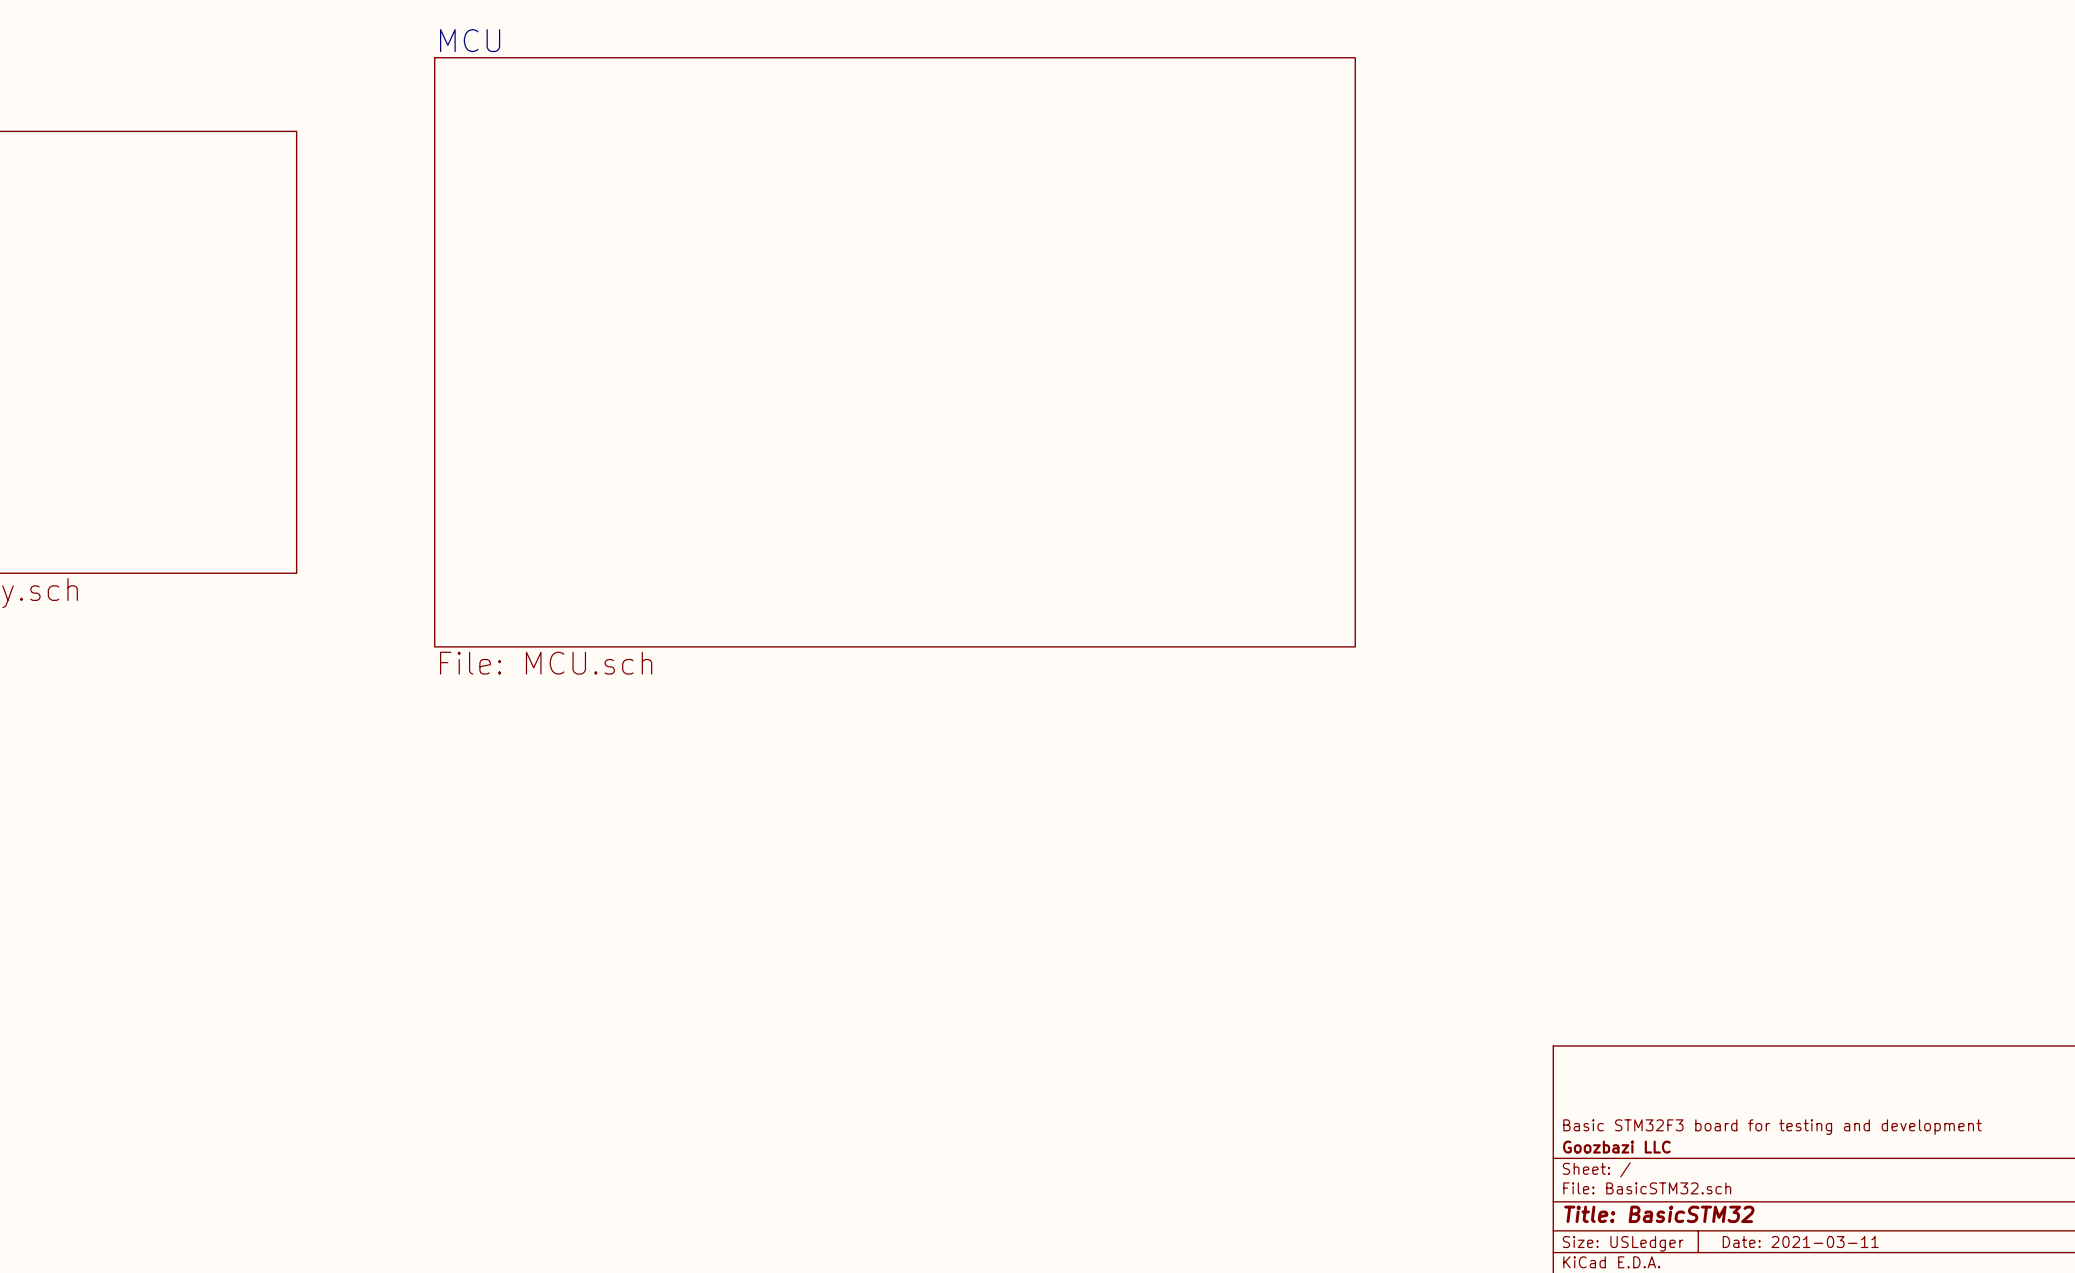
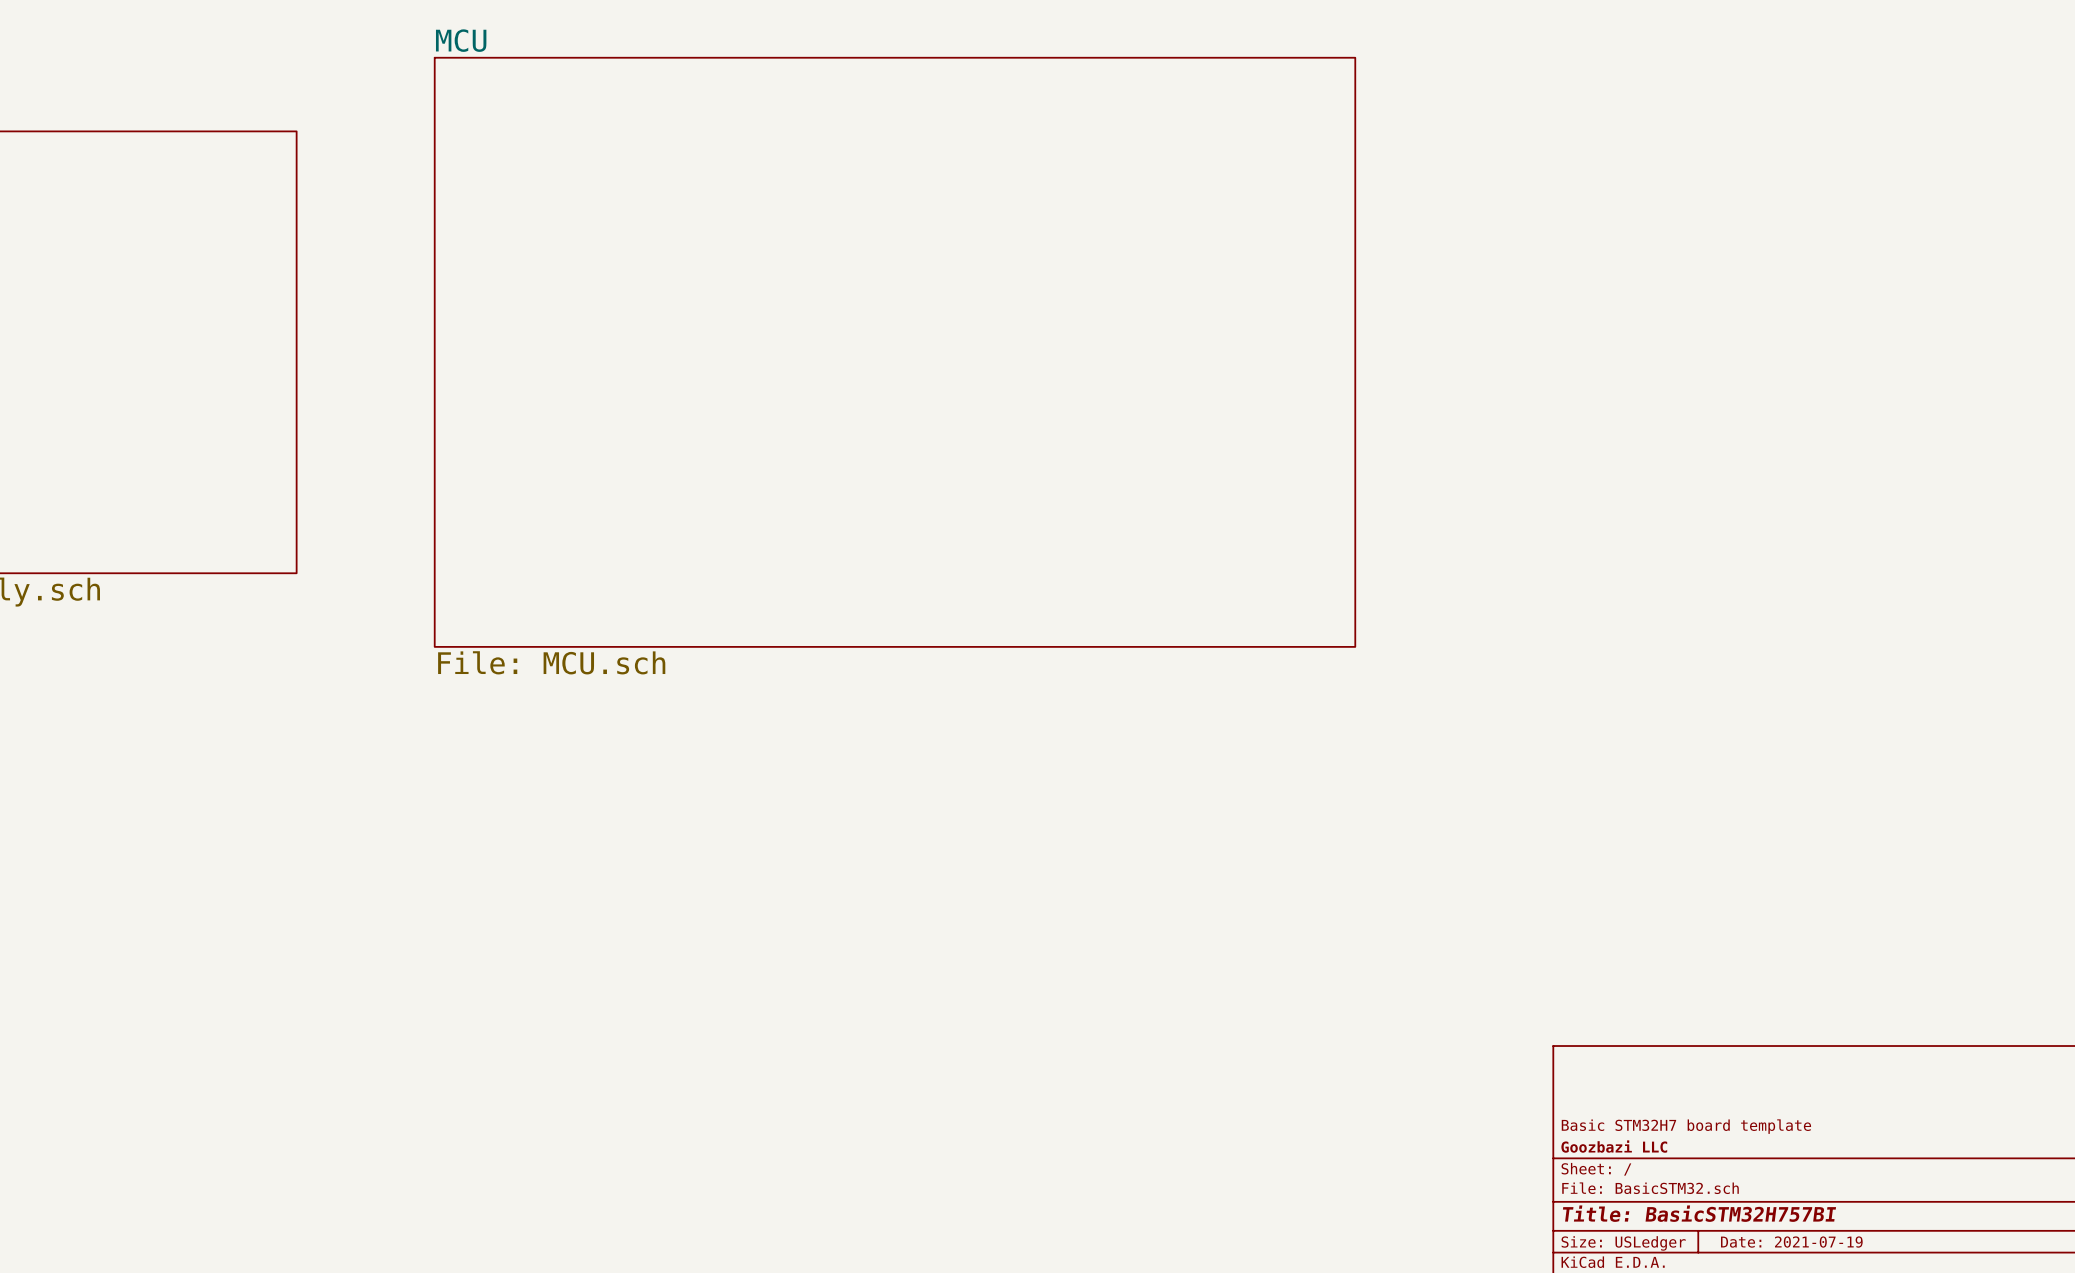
title block: Basic STM32F3 board for testing and development (1772, 1127) -> Basic STM32H7 board template (1686, 1126)
title block: Title: BasicSTM32 (1659, 1214) -> Title: BasicSTM32H757BI (1699, 1213)
title block: Date: 2021-03-11 (1800, 1242) -> Date: 2021-07-19 (1791, 1242)

